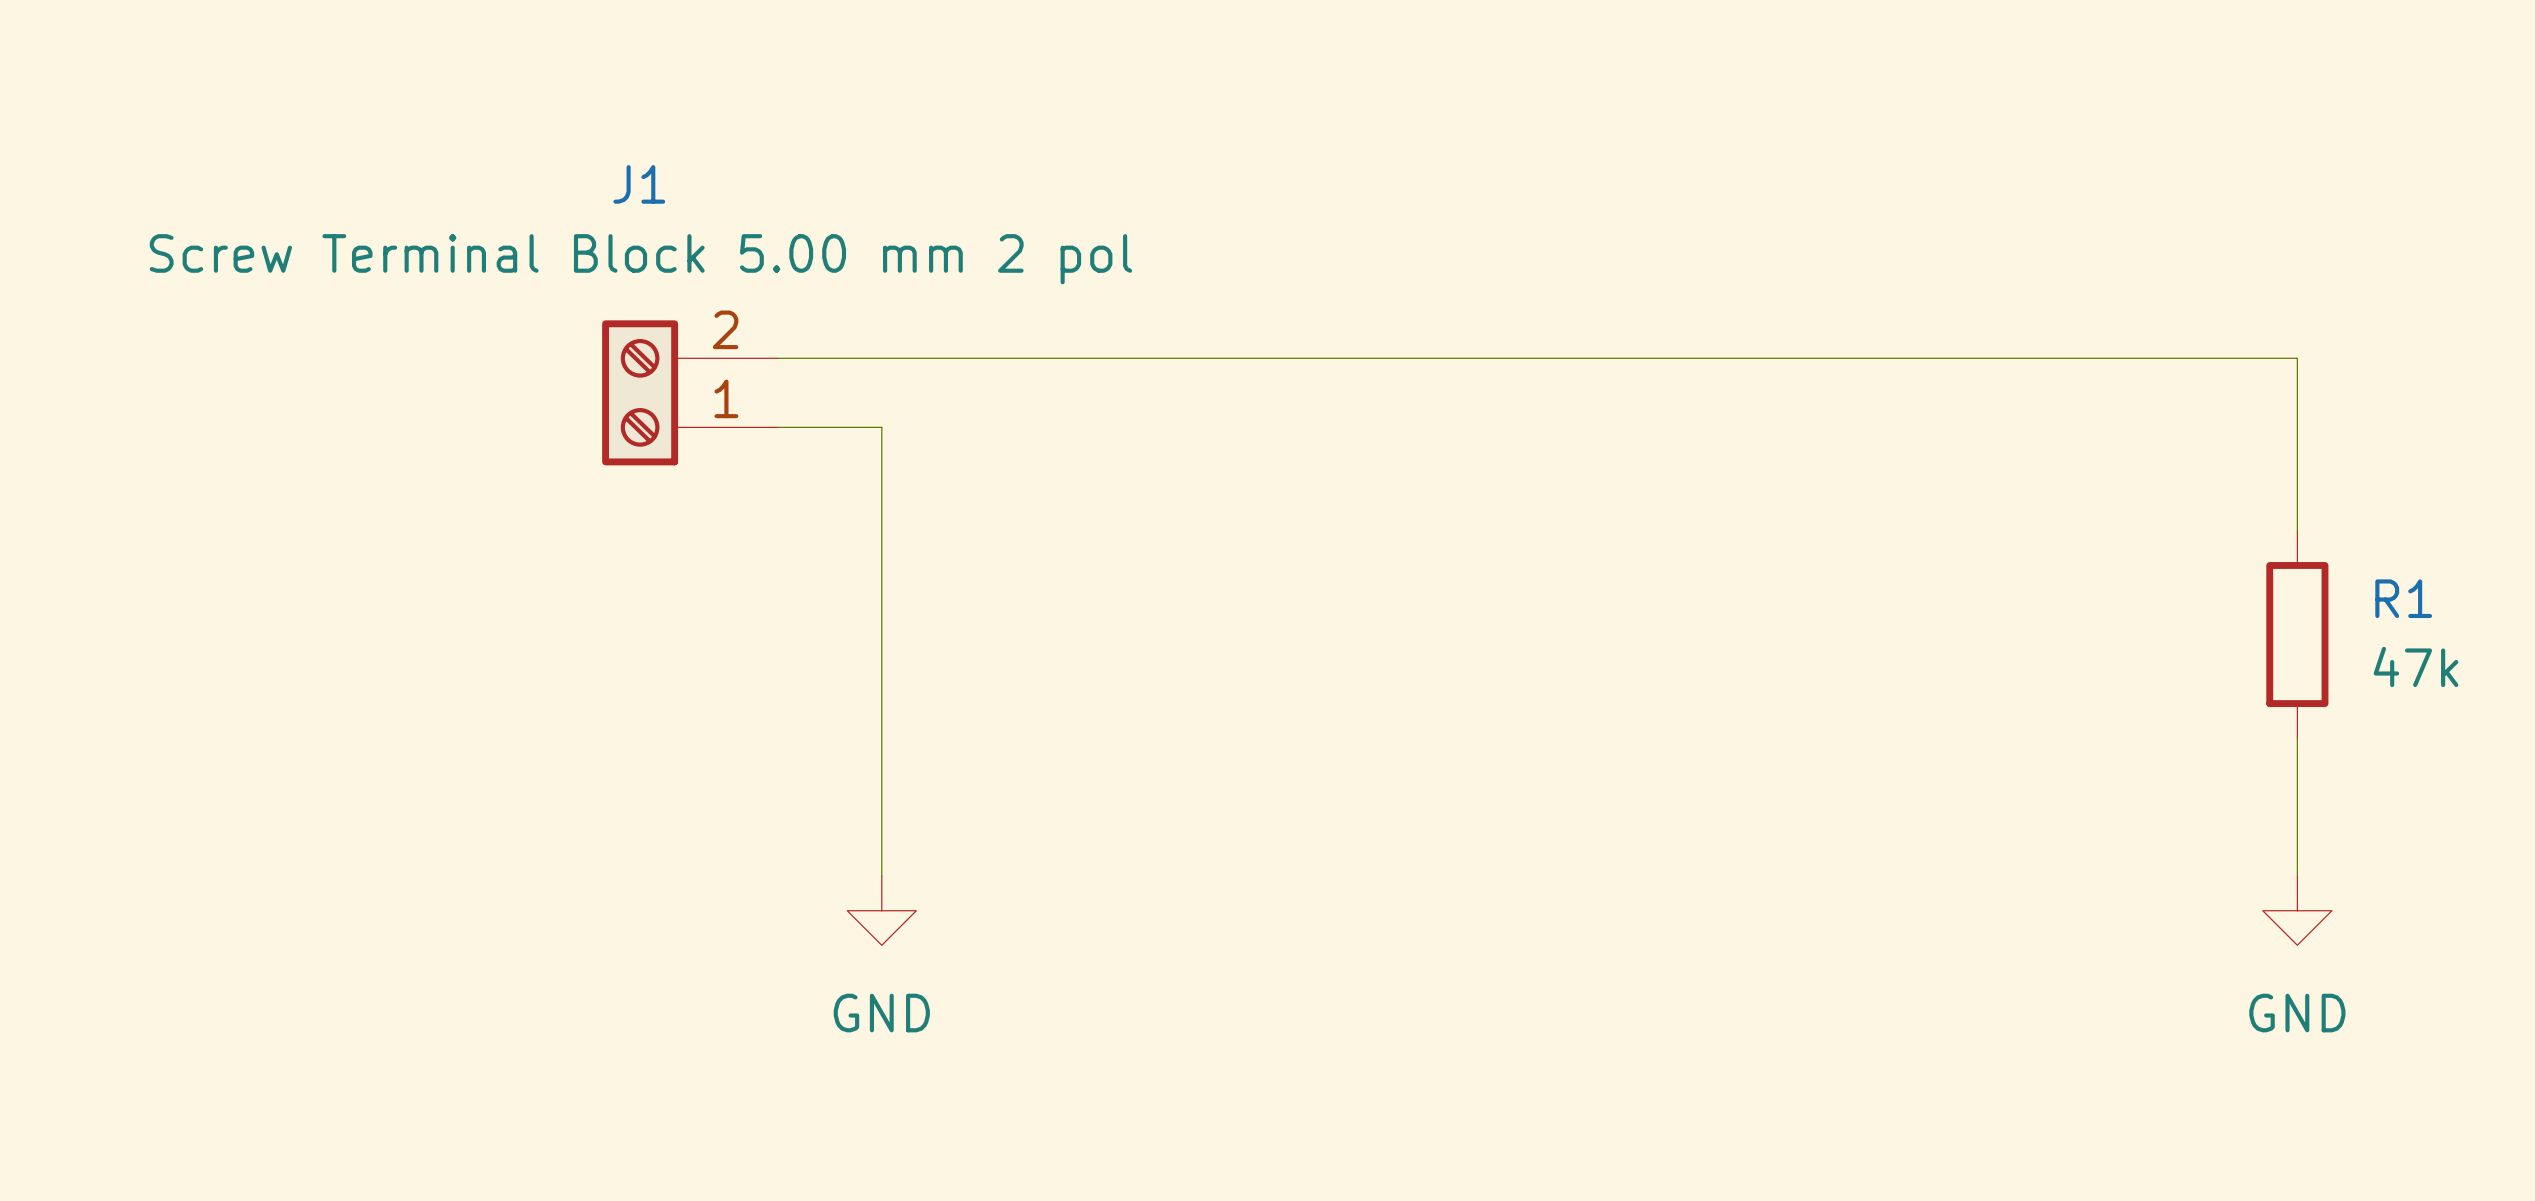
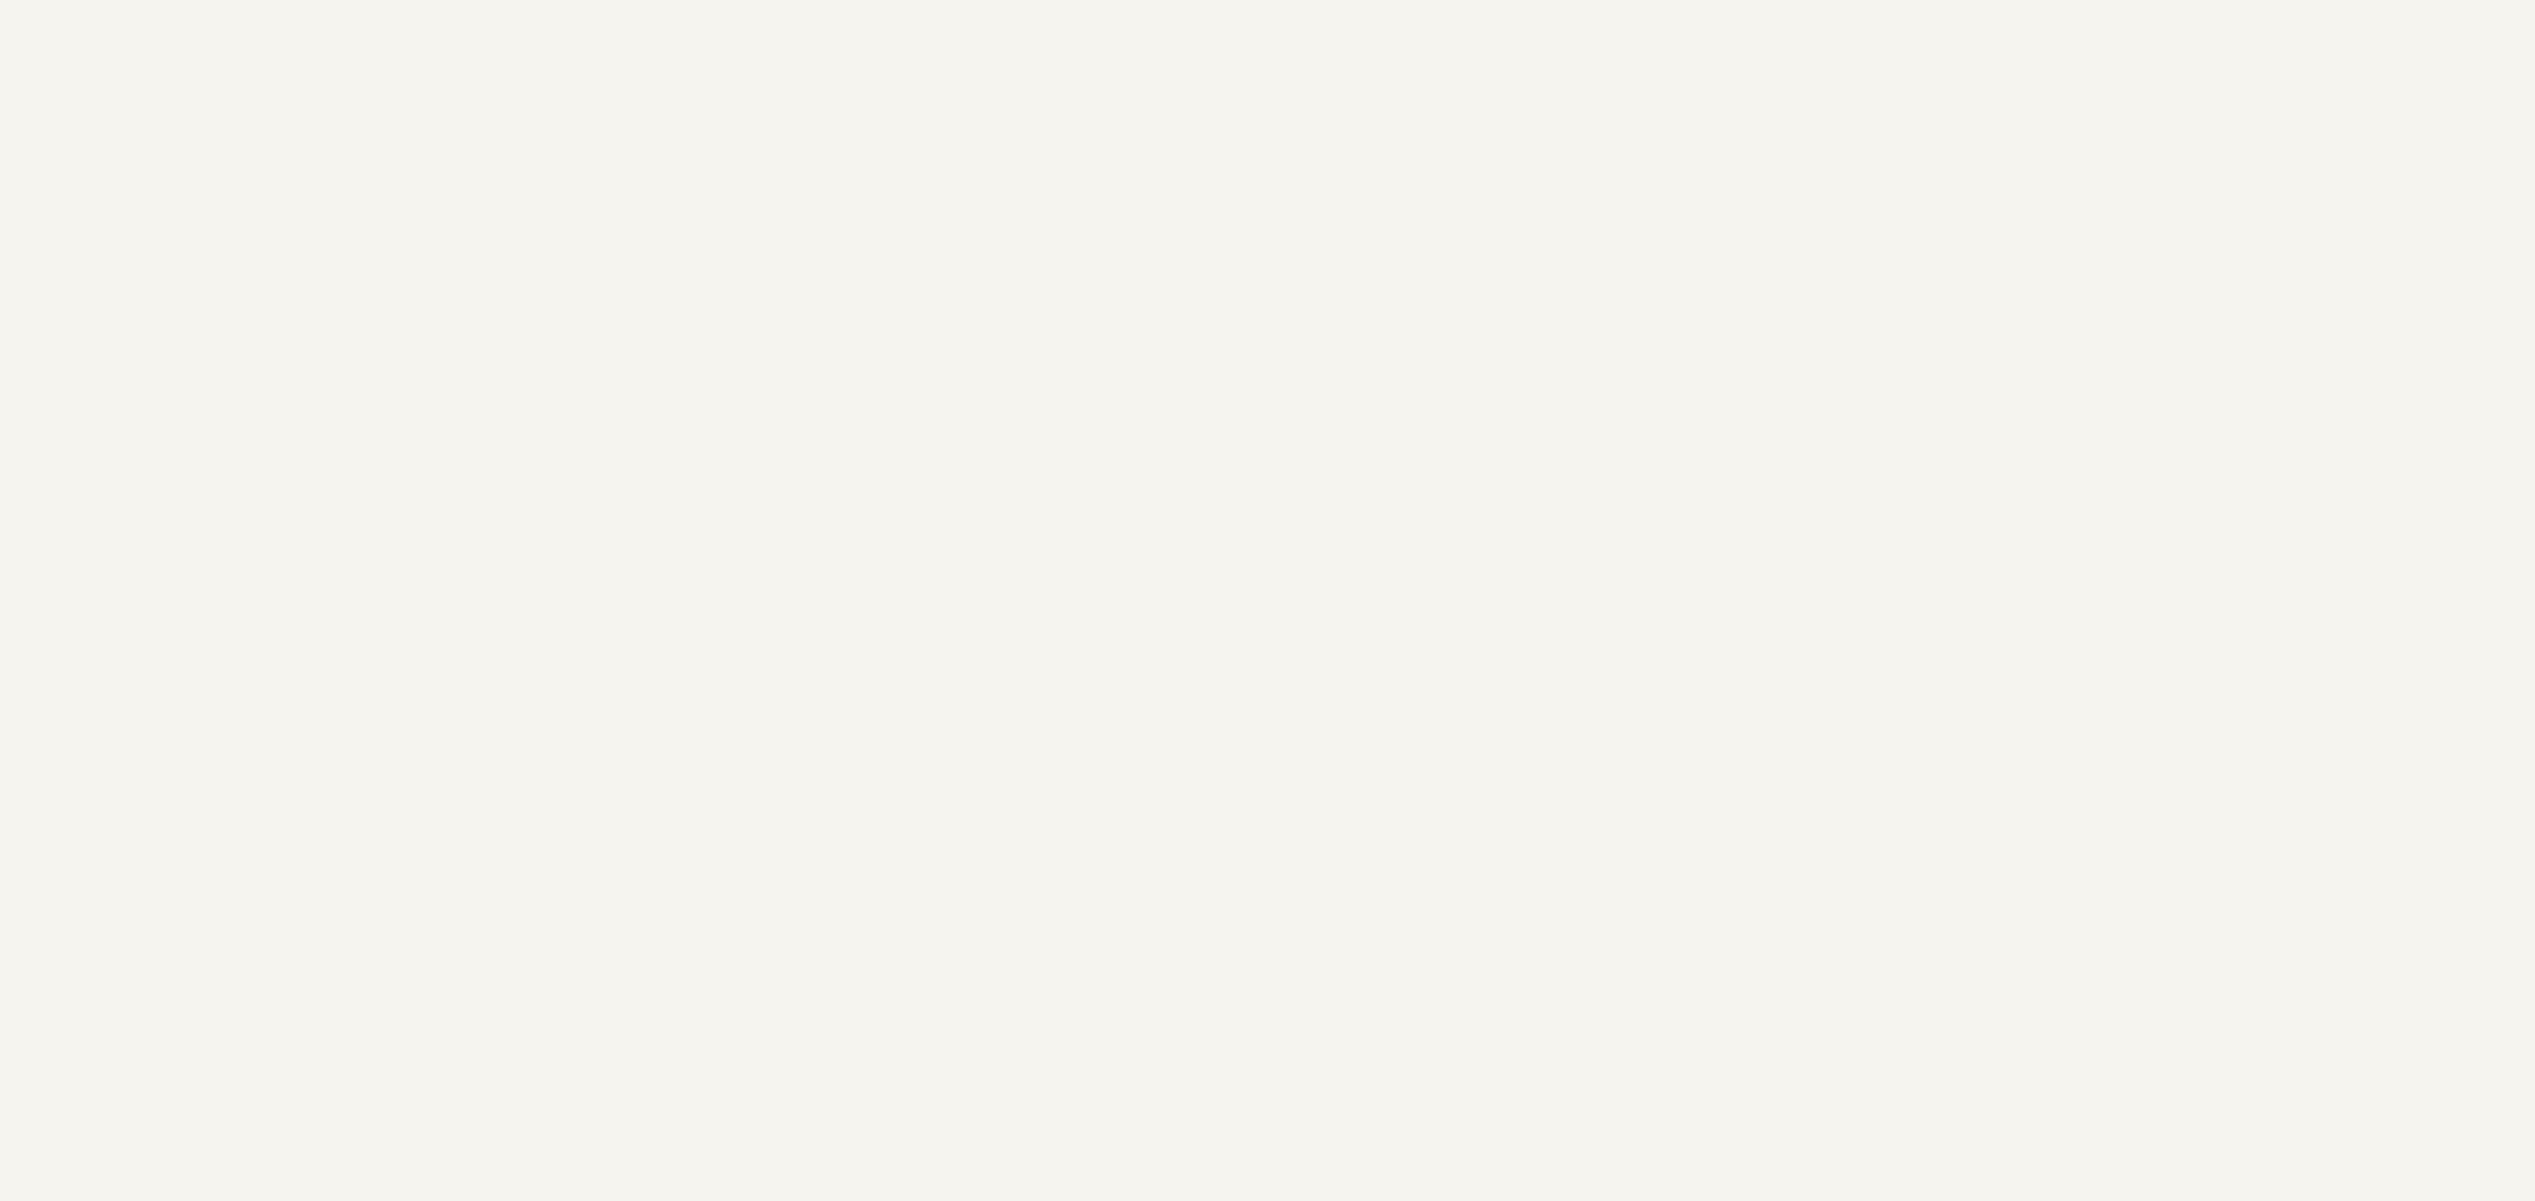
wire: (778, 358) (2297, 358) (2297, 530) -> none
J1: Screw Terminal Block 5.00 mm 2 pol (690, 392) -> none
wire: (778, 427) (881, 427) (881, 876) -> none
R1: (2297, 634) -> none
wire: (2297, 738) (2297, 876) -> none
power symbol: GND (881, 910) -> none
power symbol: GND (2297, 910) -> none

